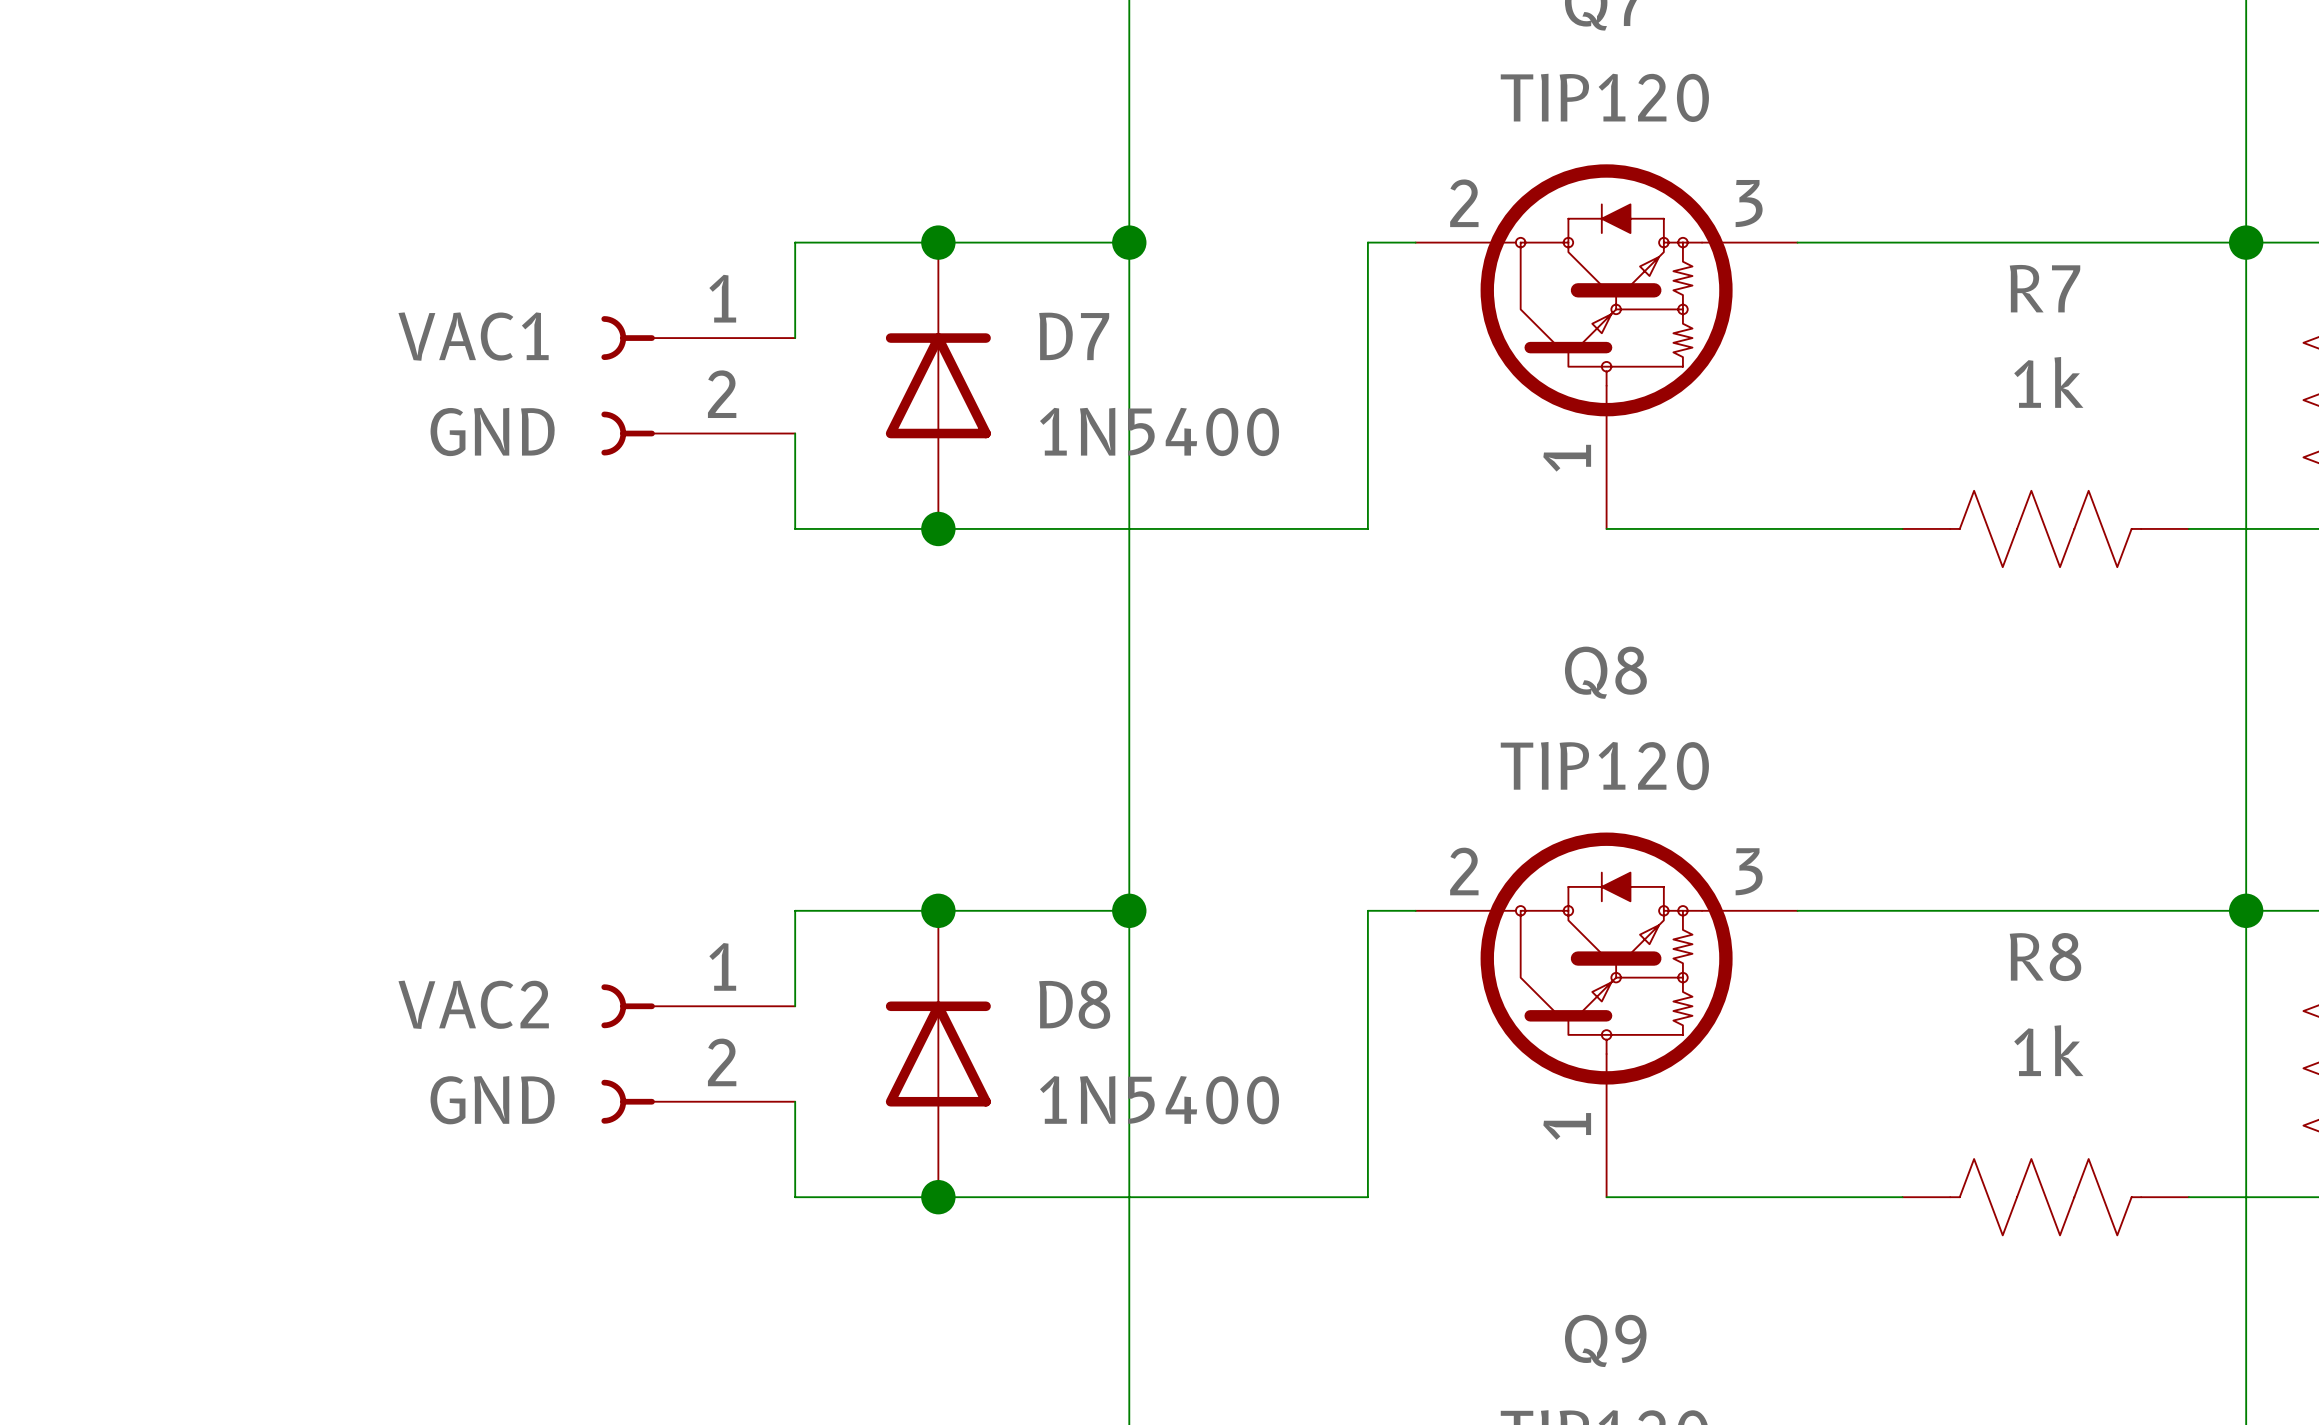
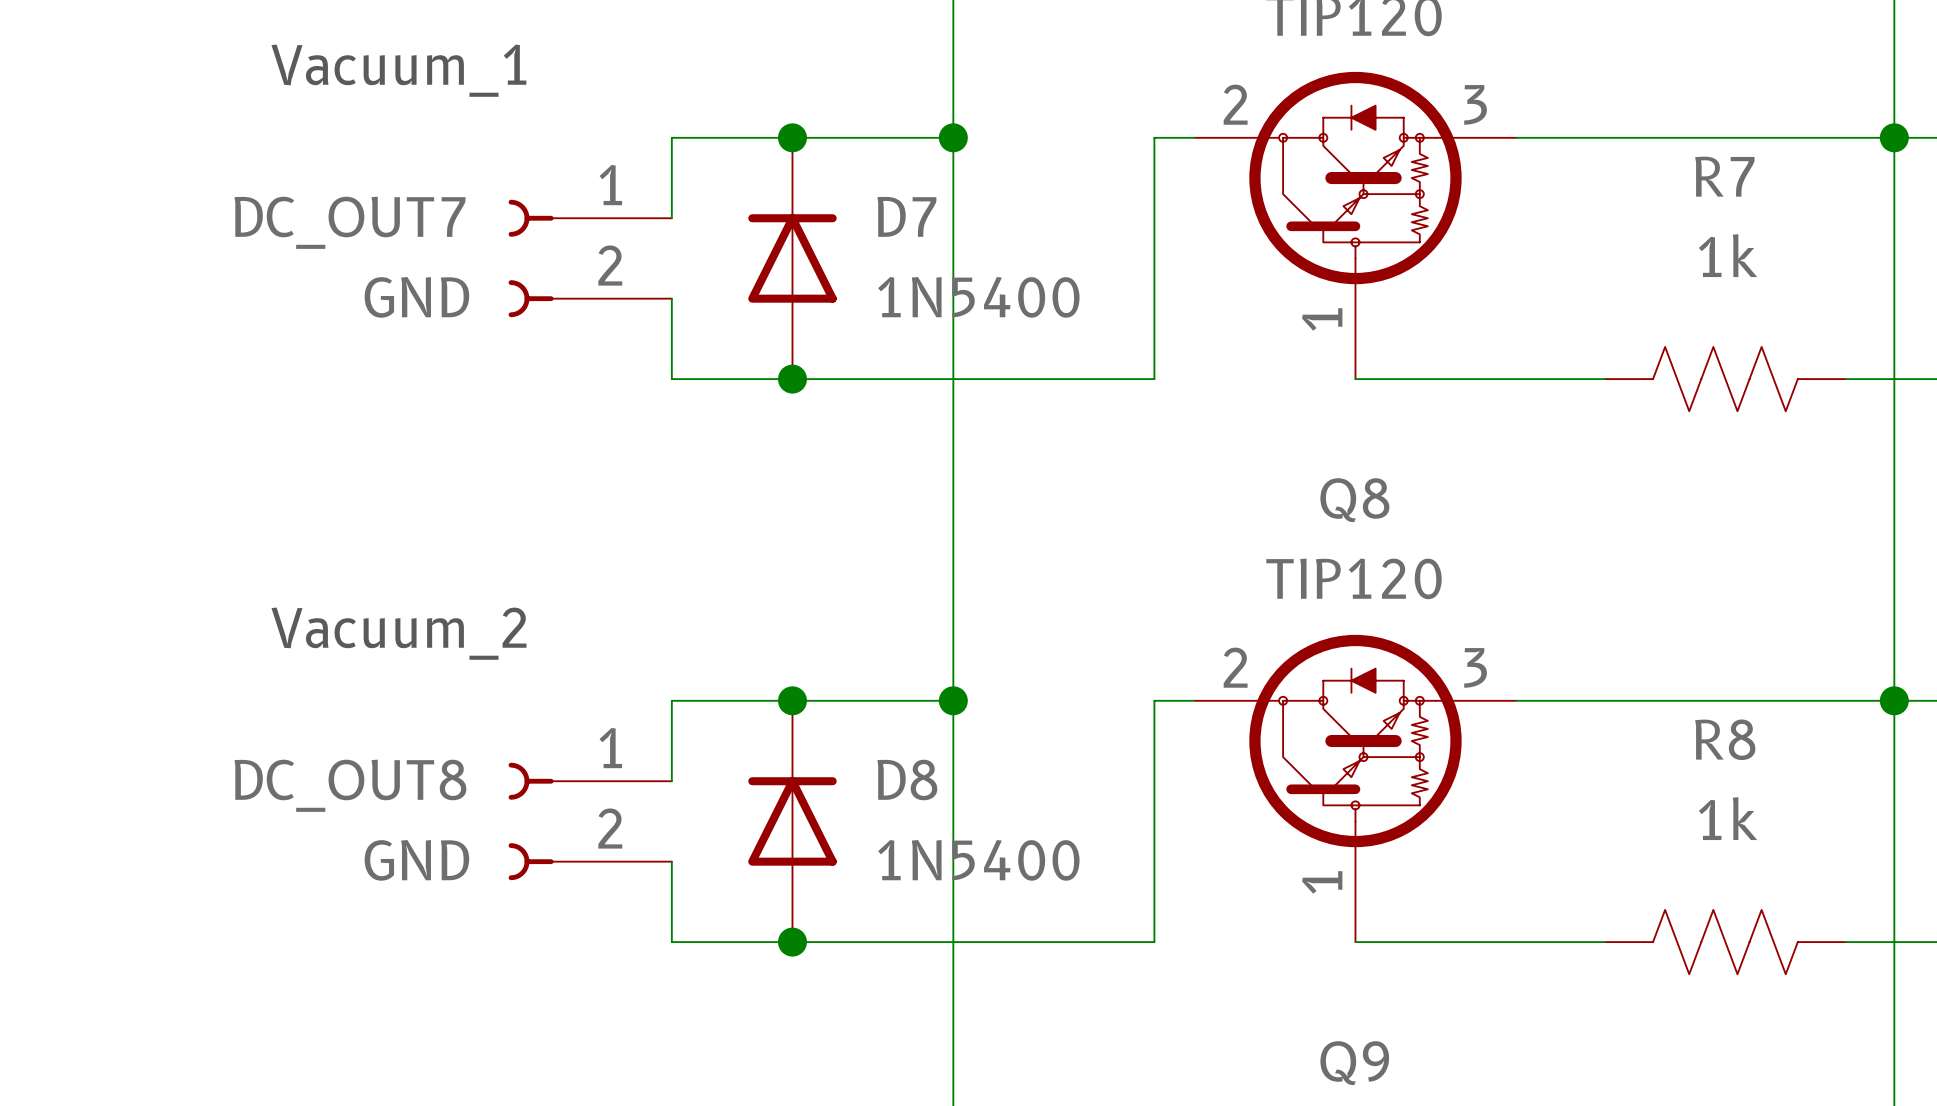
text: none -> Vacuum_1 (398, 70)
VAC1 name: VAC1 (473, 336) -> DC_OUT7 (350, 222)
text: none -> Vacuum_2 (398, 633)
VAC2 name: VAC2 (473, 1004) -> DC_OUT8 (350, 785)

